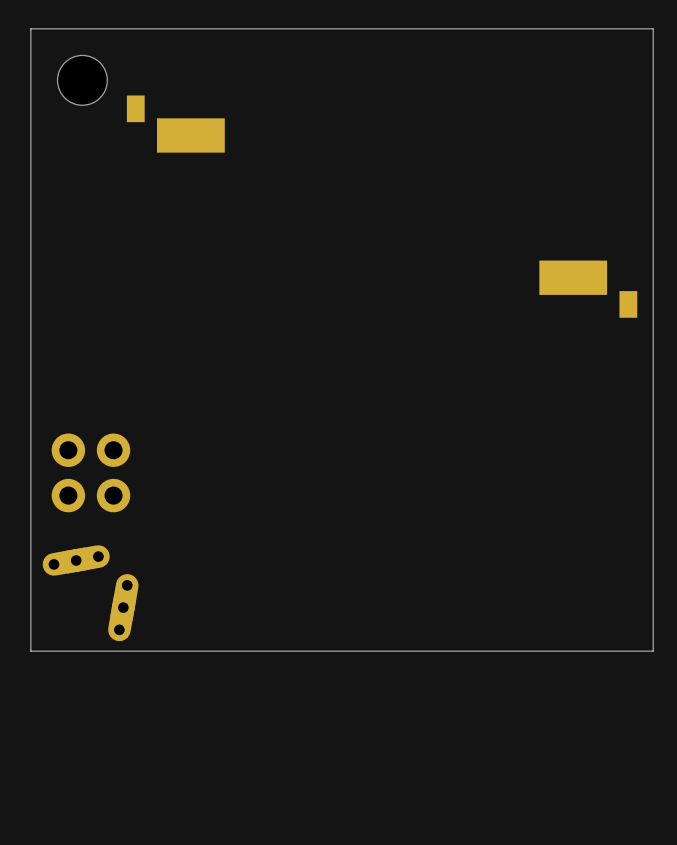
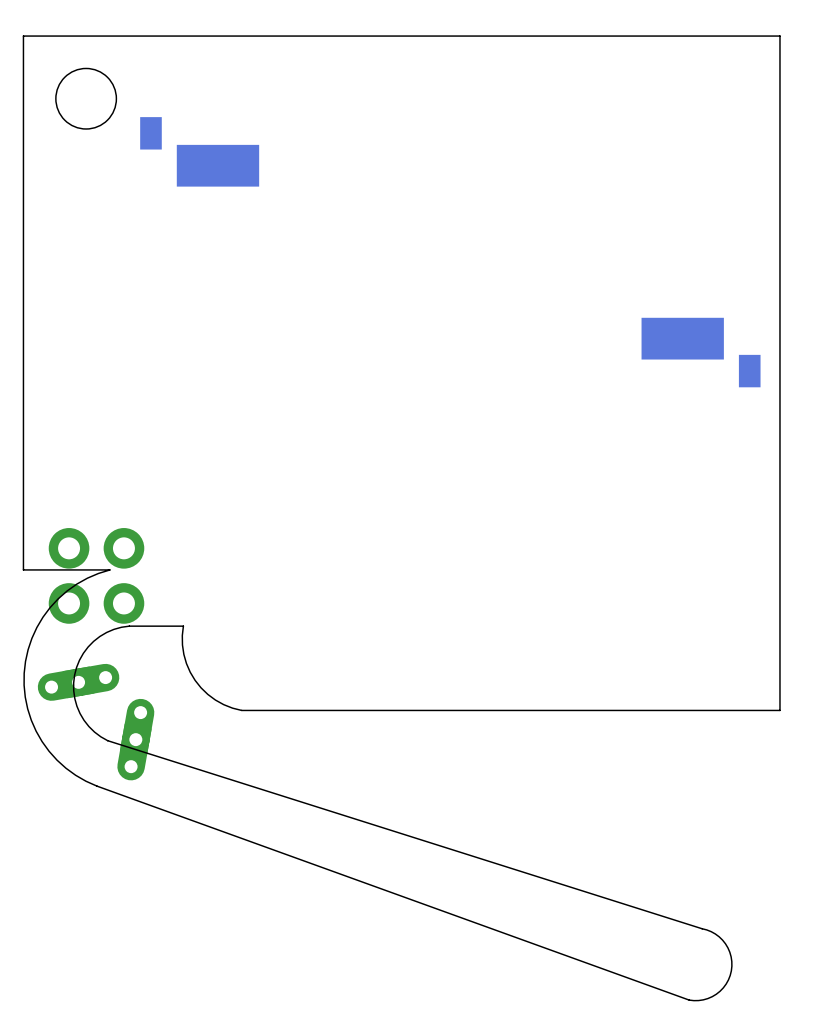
board edge: (30, 468) (30, 651) (653, 651) (653, 583) -> (23, 569) (109, 569) (87, 578) (58, 598) (36, 627) (25, 661) (24, 685) (31, 720) (49, 751) (75, 775) (96, 786) (689, 1000) (703, 999) (712, 996) (723, 987) (730, 975) (731, 961) (727, 947) (722, 940) (711, 931) (107, 740) (88, 726) (76, 706) (73, 690) (76, 667) (88, 646) (99, 636) (113, 629) (129, 626) (183, 626) (183, 654) (195, 680) (215, 700) (241, 710) (779, 710)

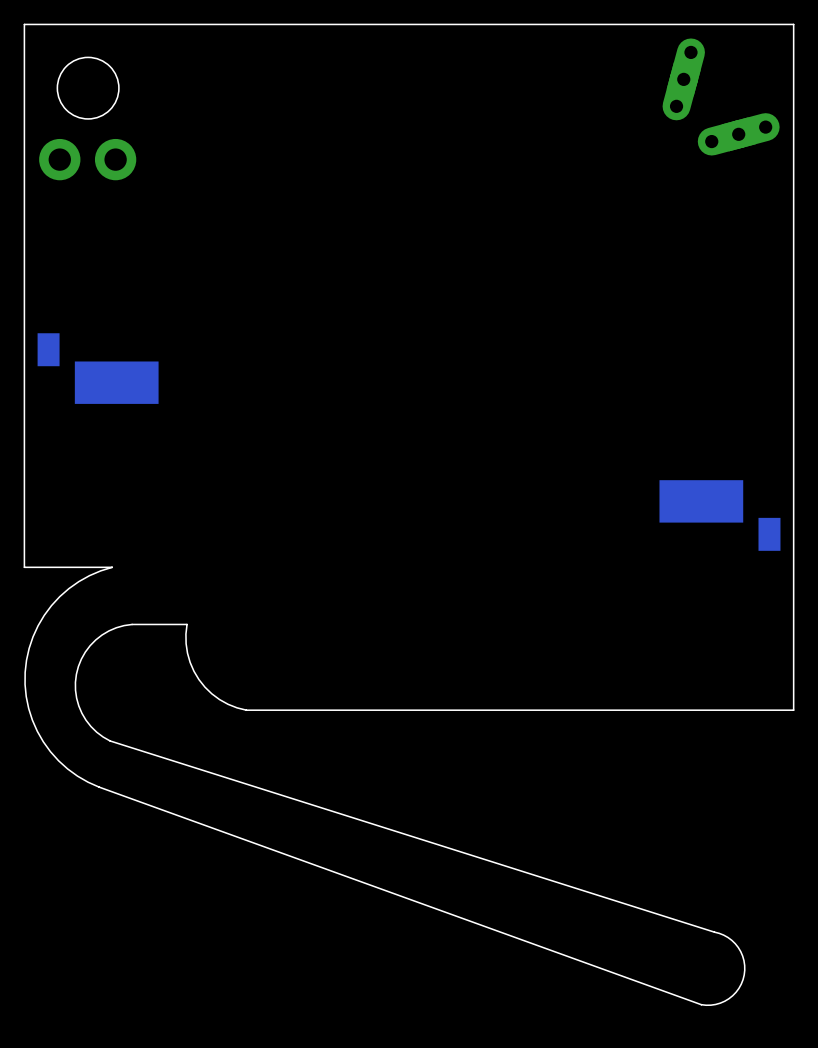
part: none -> (683, 79)
part: none -> (738, 134)
part position: (199, 151) -> (98, 368)
part: none -> (87, 159)
part position: (701, 352) -> (719, 515)
part: (96, 548) -> none
part: (96, 603) -> none
part: (78, 682) -> none
part: (135, 739) -> none

